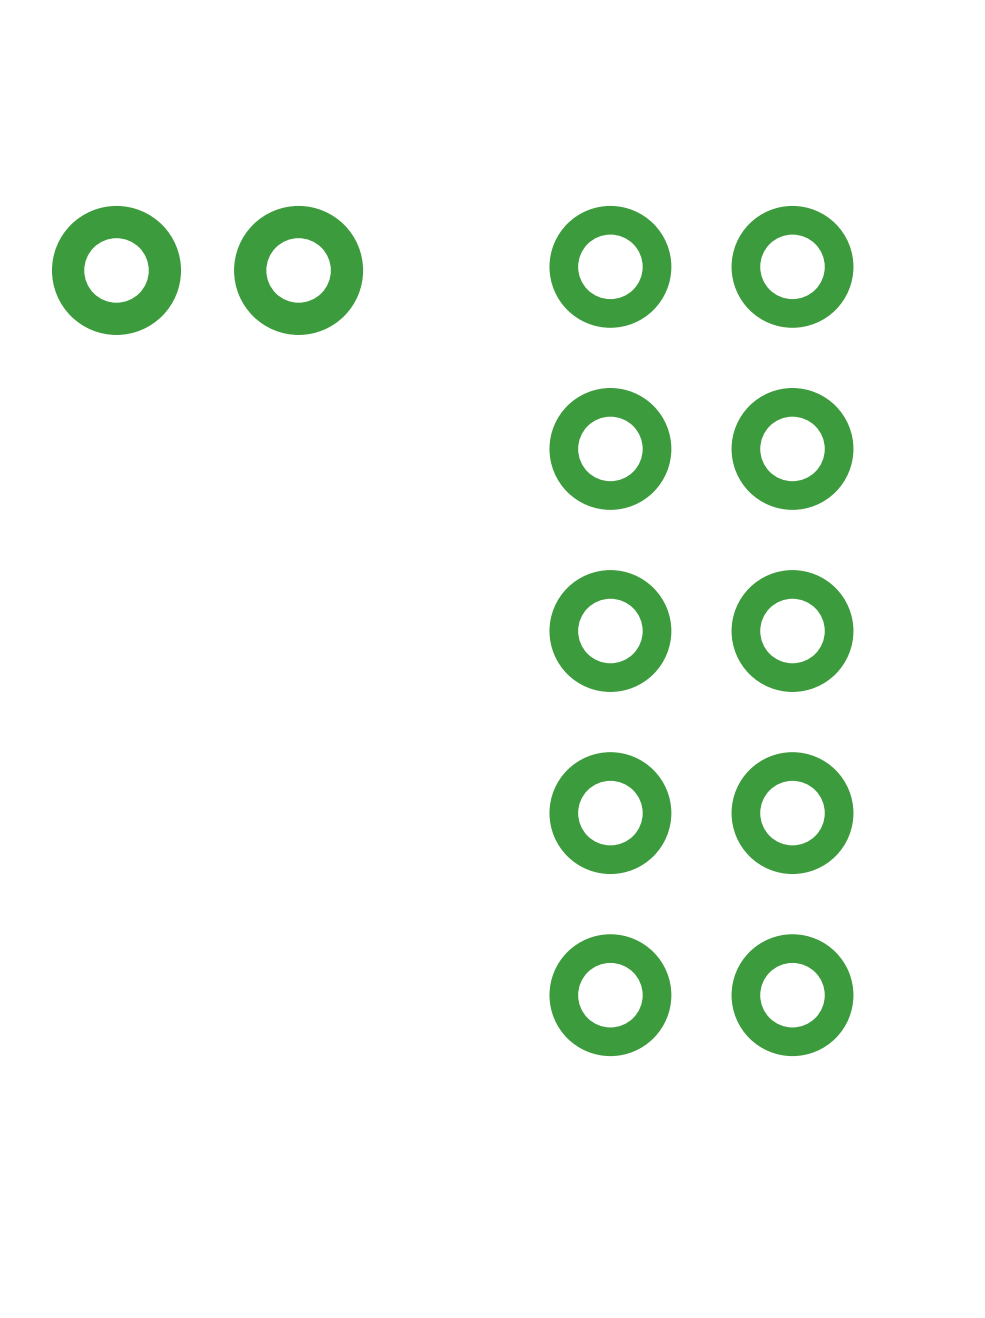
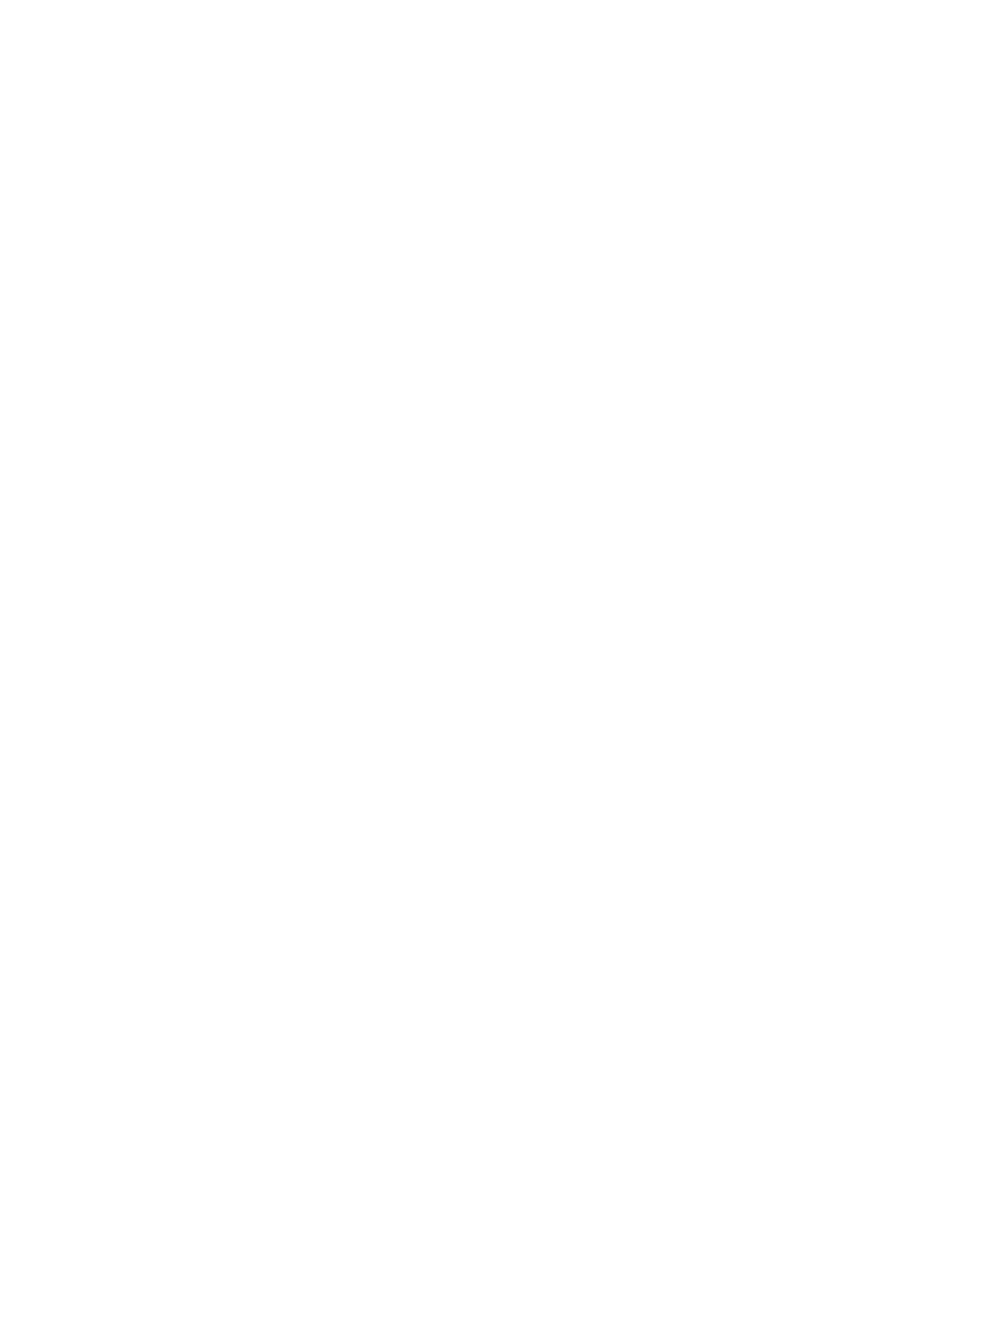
part: (207, 270) -> none
part: (701, 631) -> none

